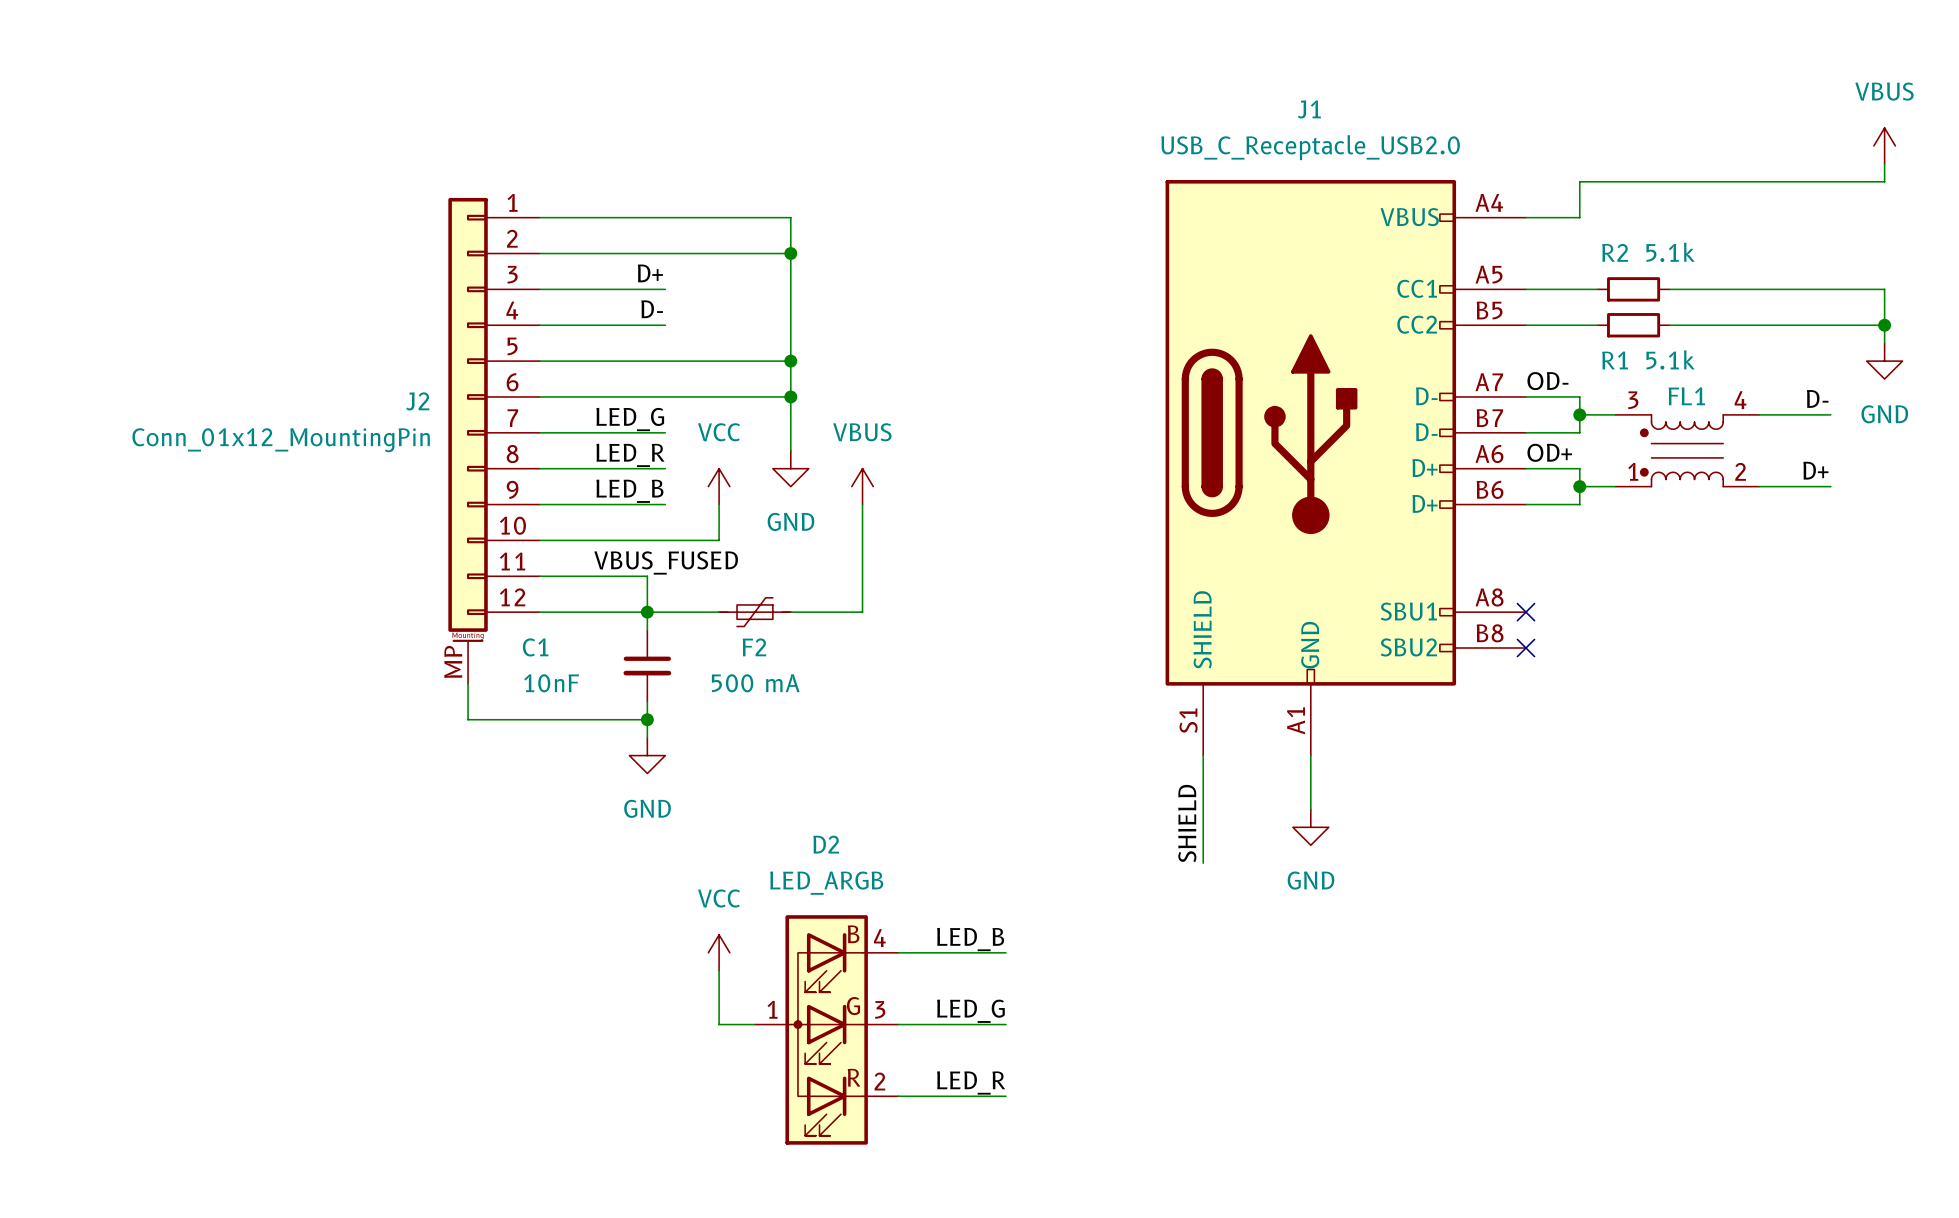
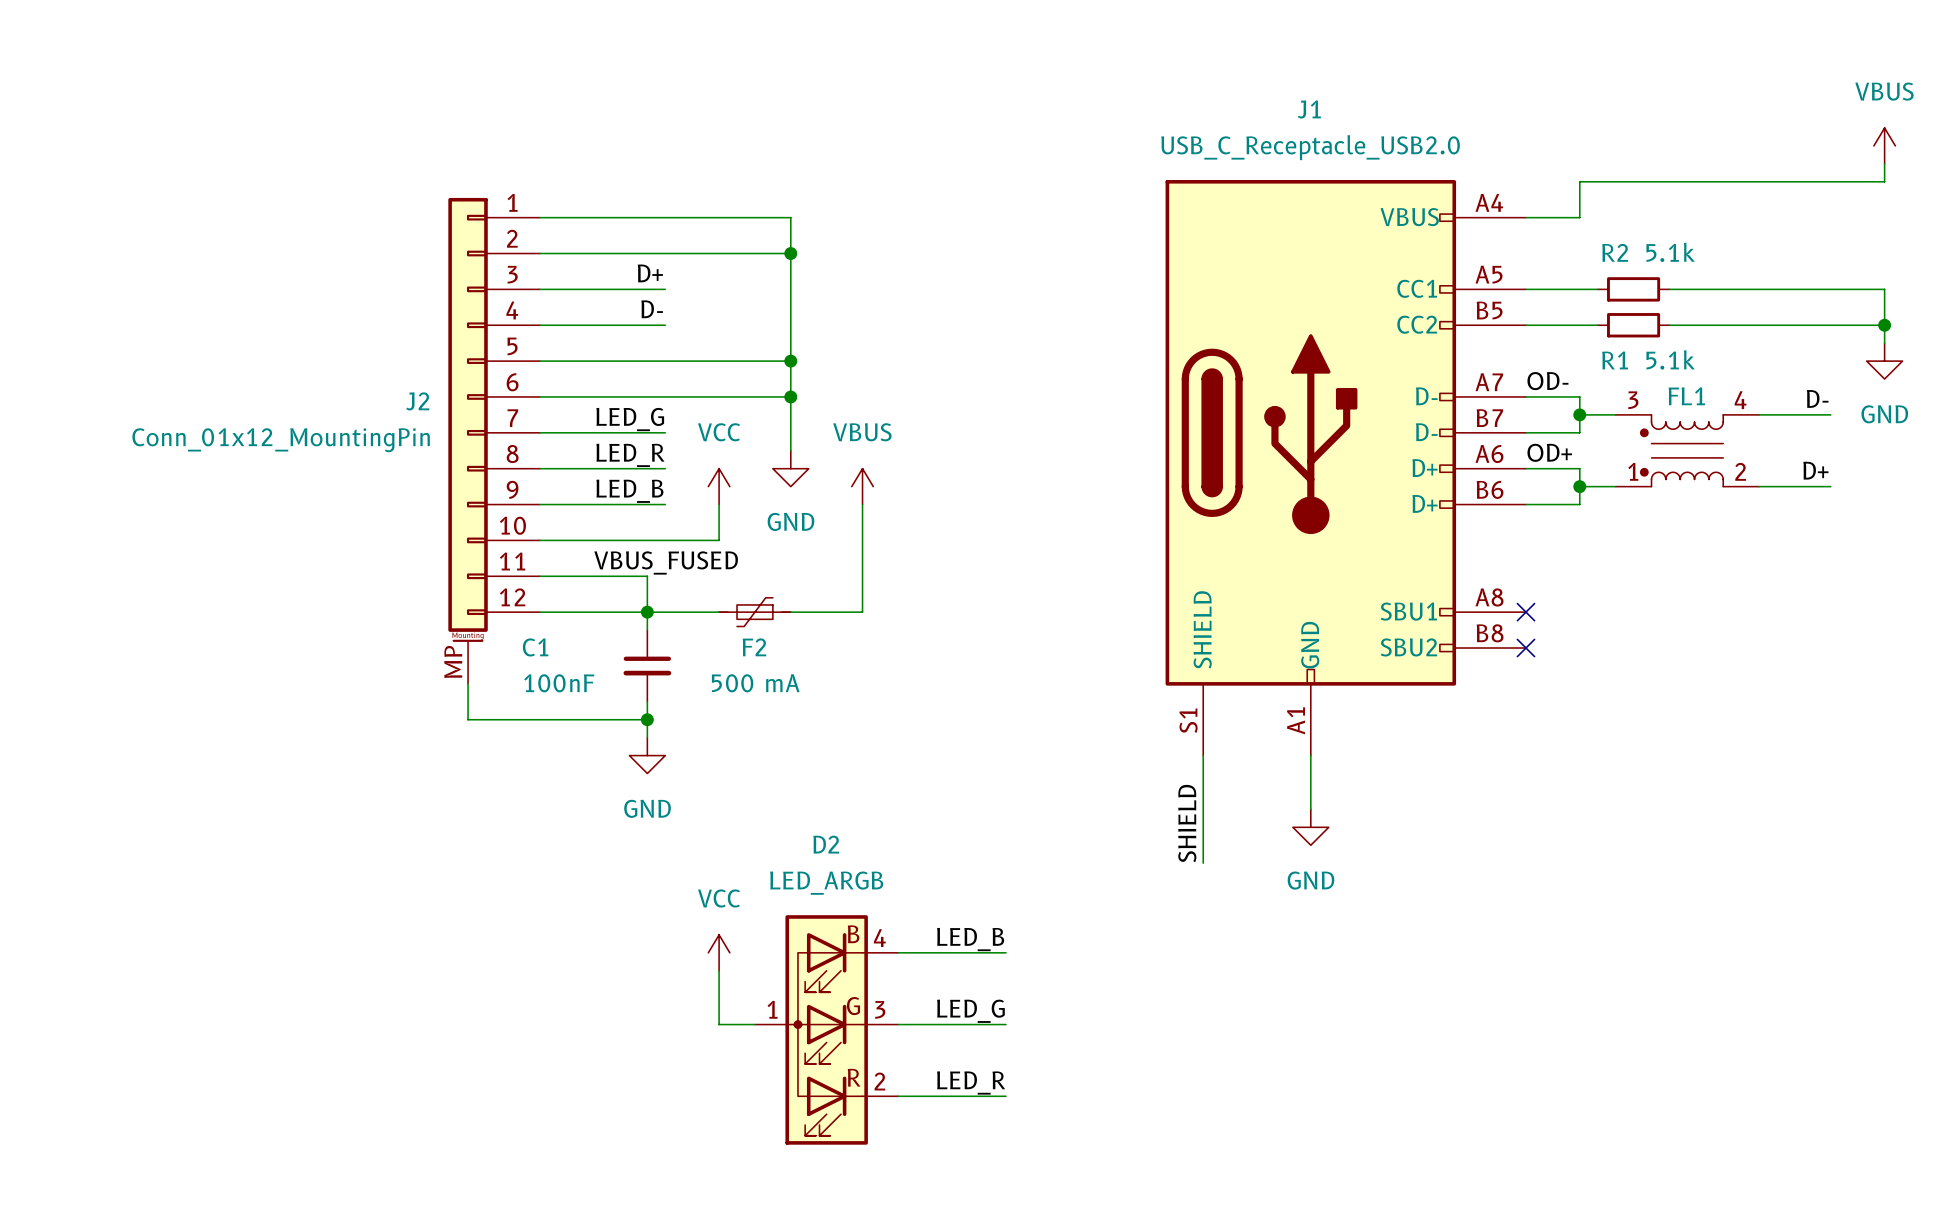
C1 value: 10nF (551, 683) -> 100nF (559, 683)

